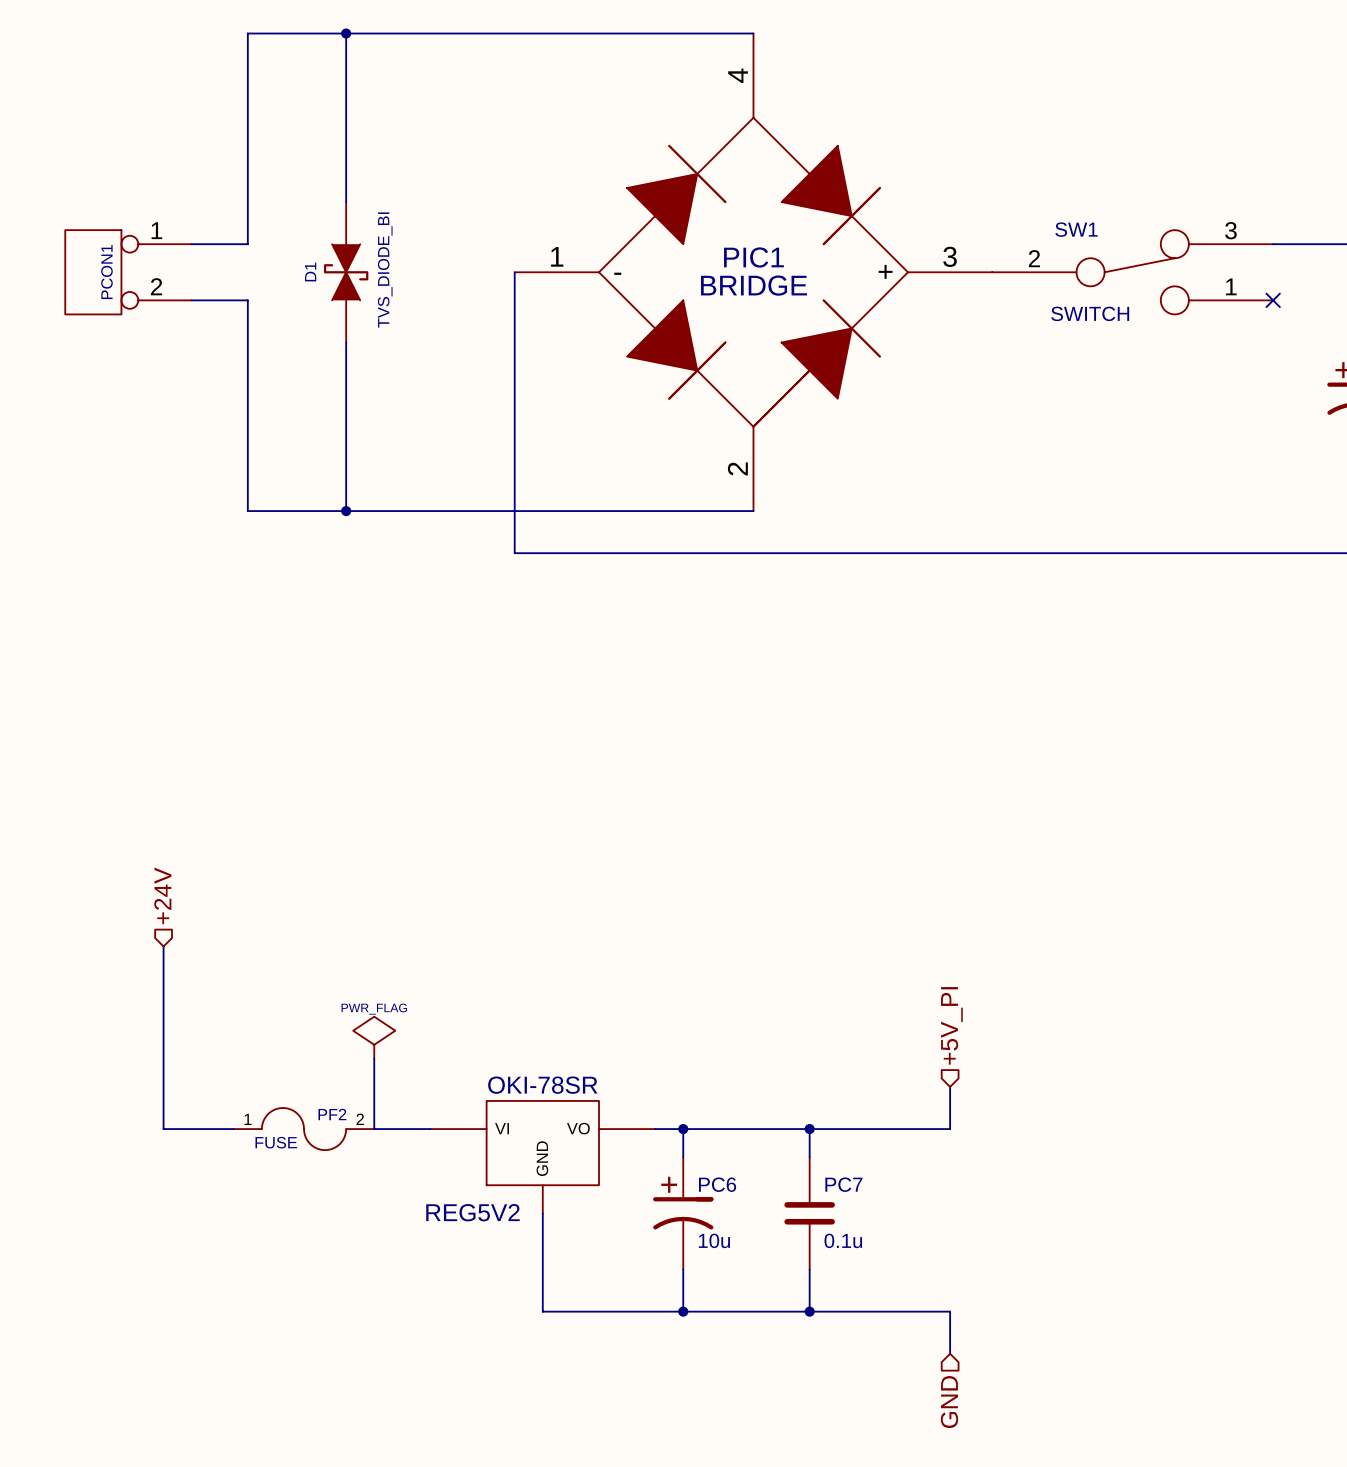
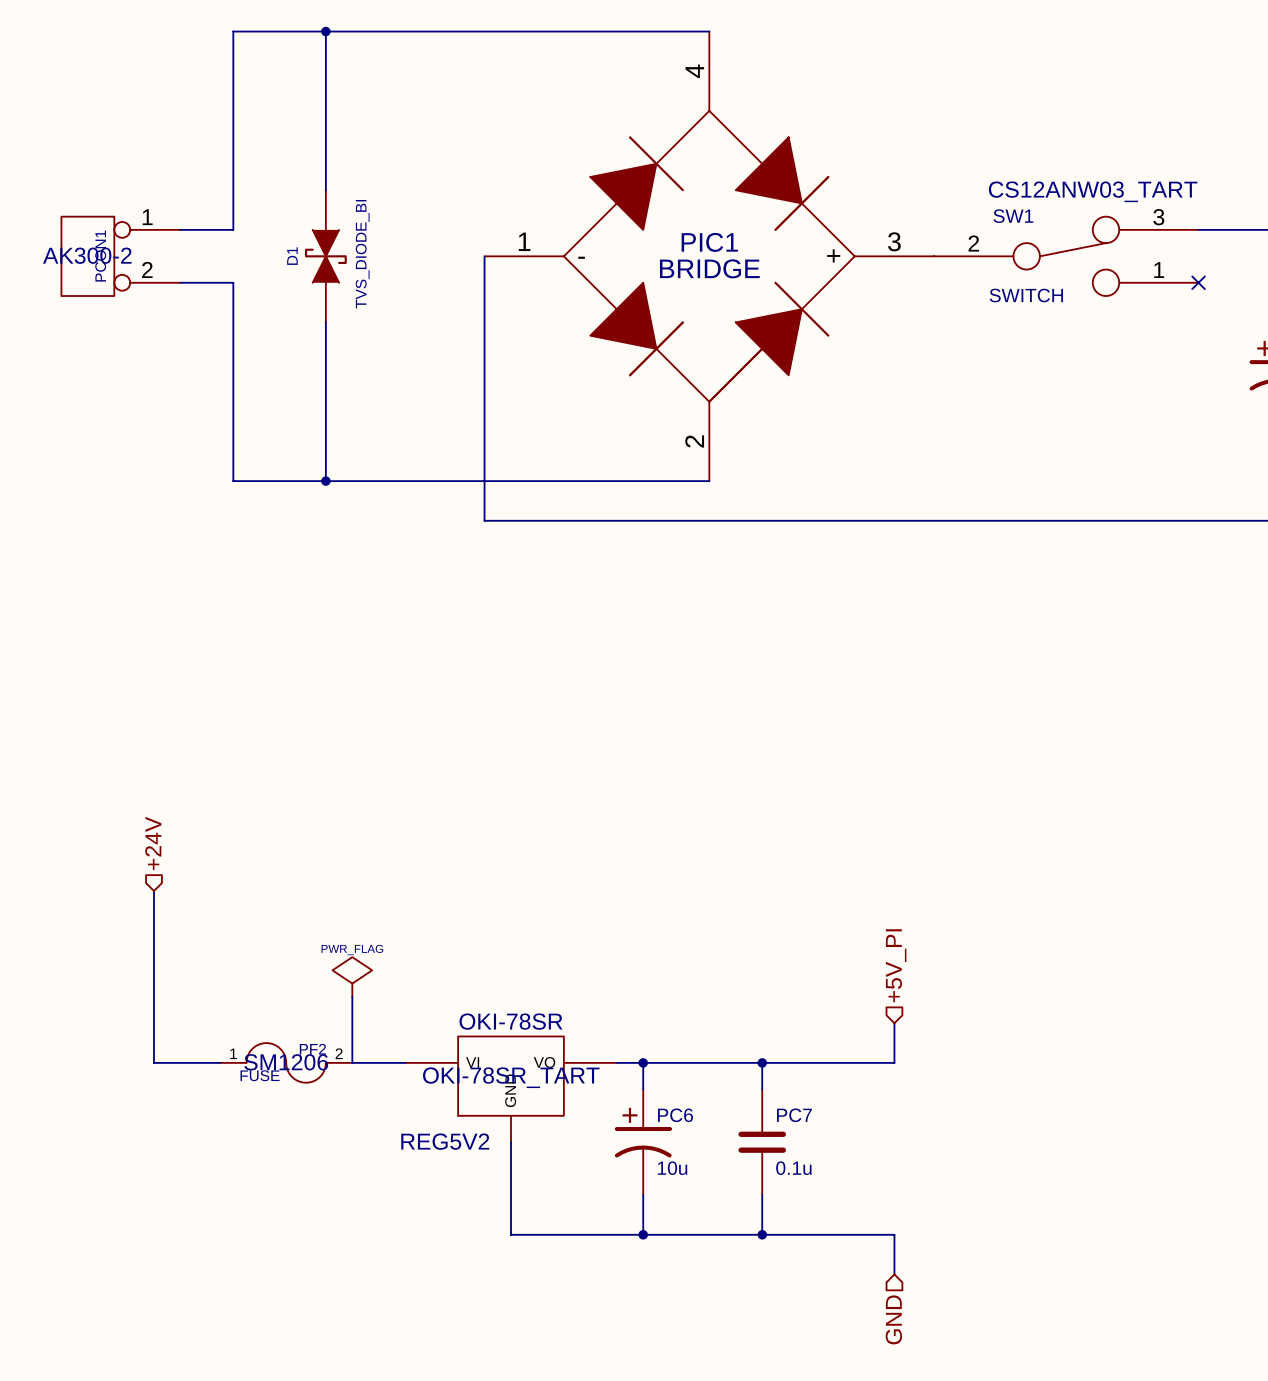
SW1 text: none -> CS12ANW03_TART (1093, 191)
PCON1 text: none -> AK300-2 (87, 255)
PF2 text: none -> SM1206 (286, 1062)
REG5V2 text: none -> OKI-78SR_TART (511, 1077)

